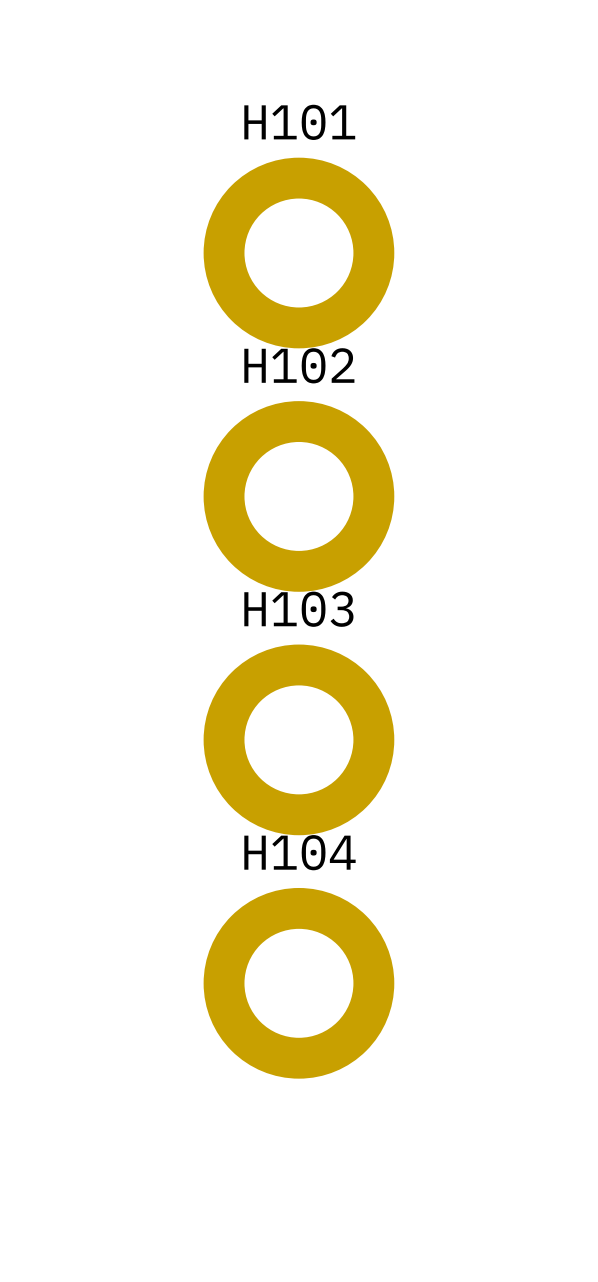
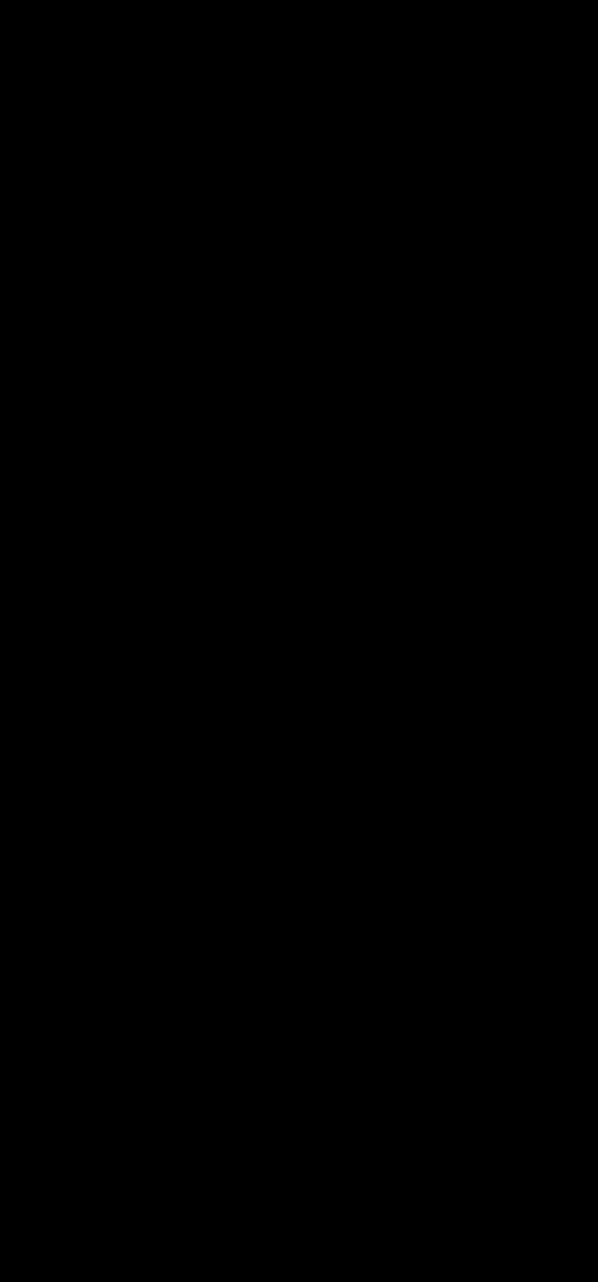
H101: (298, 253) -> none
H102: (298, 496) -> none
H103: (298, 739) -> none
H104: (298, 983) -> none

